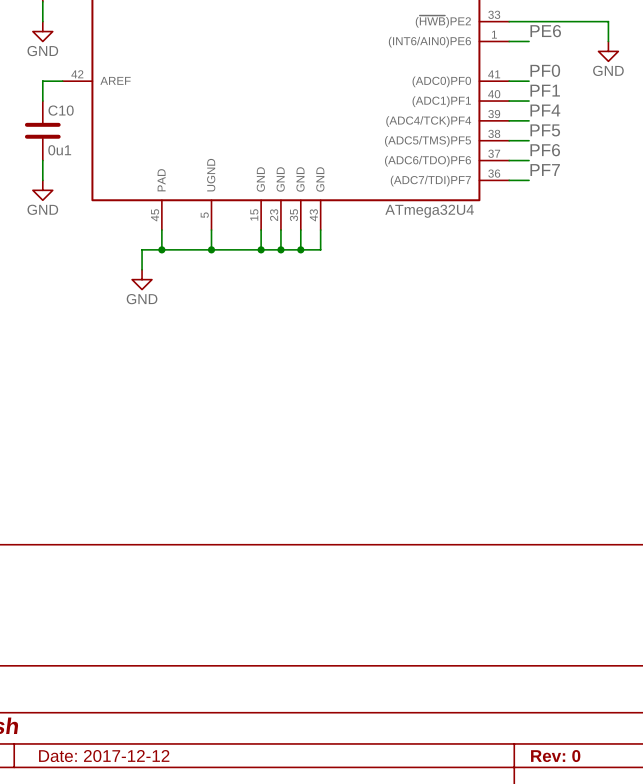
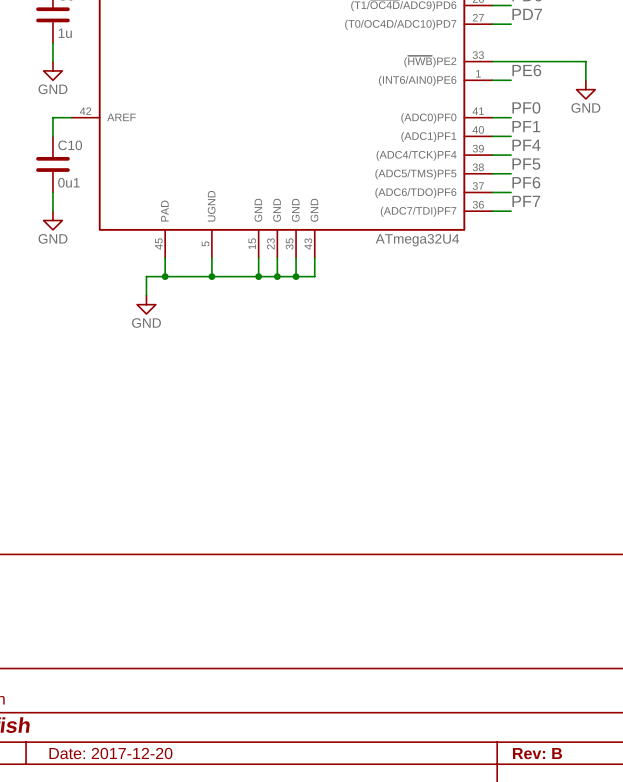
title block: Date: 2017-12-12 (104, 756) -> Date: 2017-12-20 (110, 753)
title block: Rev: 0 (555, 756) -> Rev: B (537, 753)

